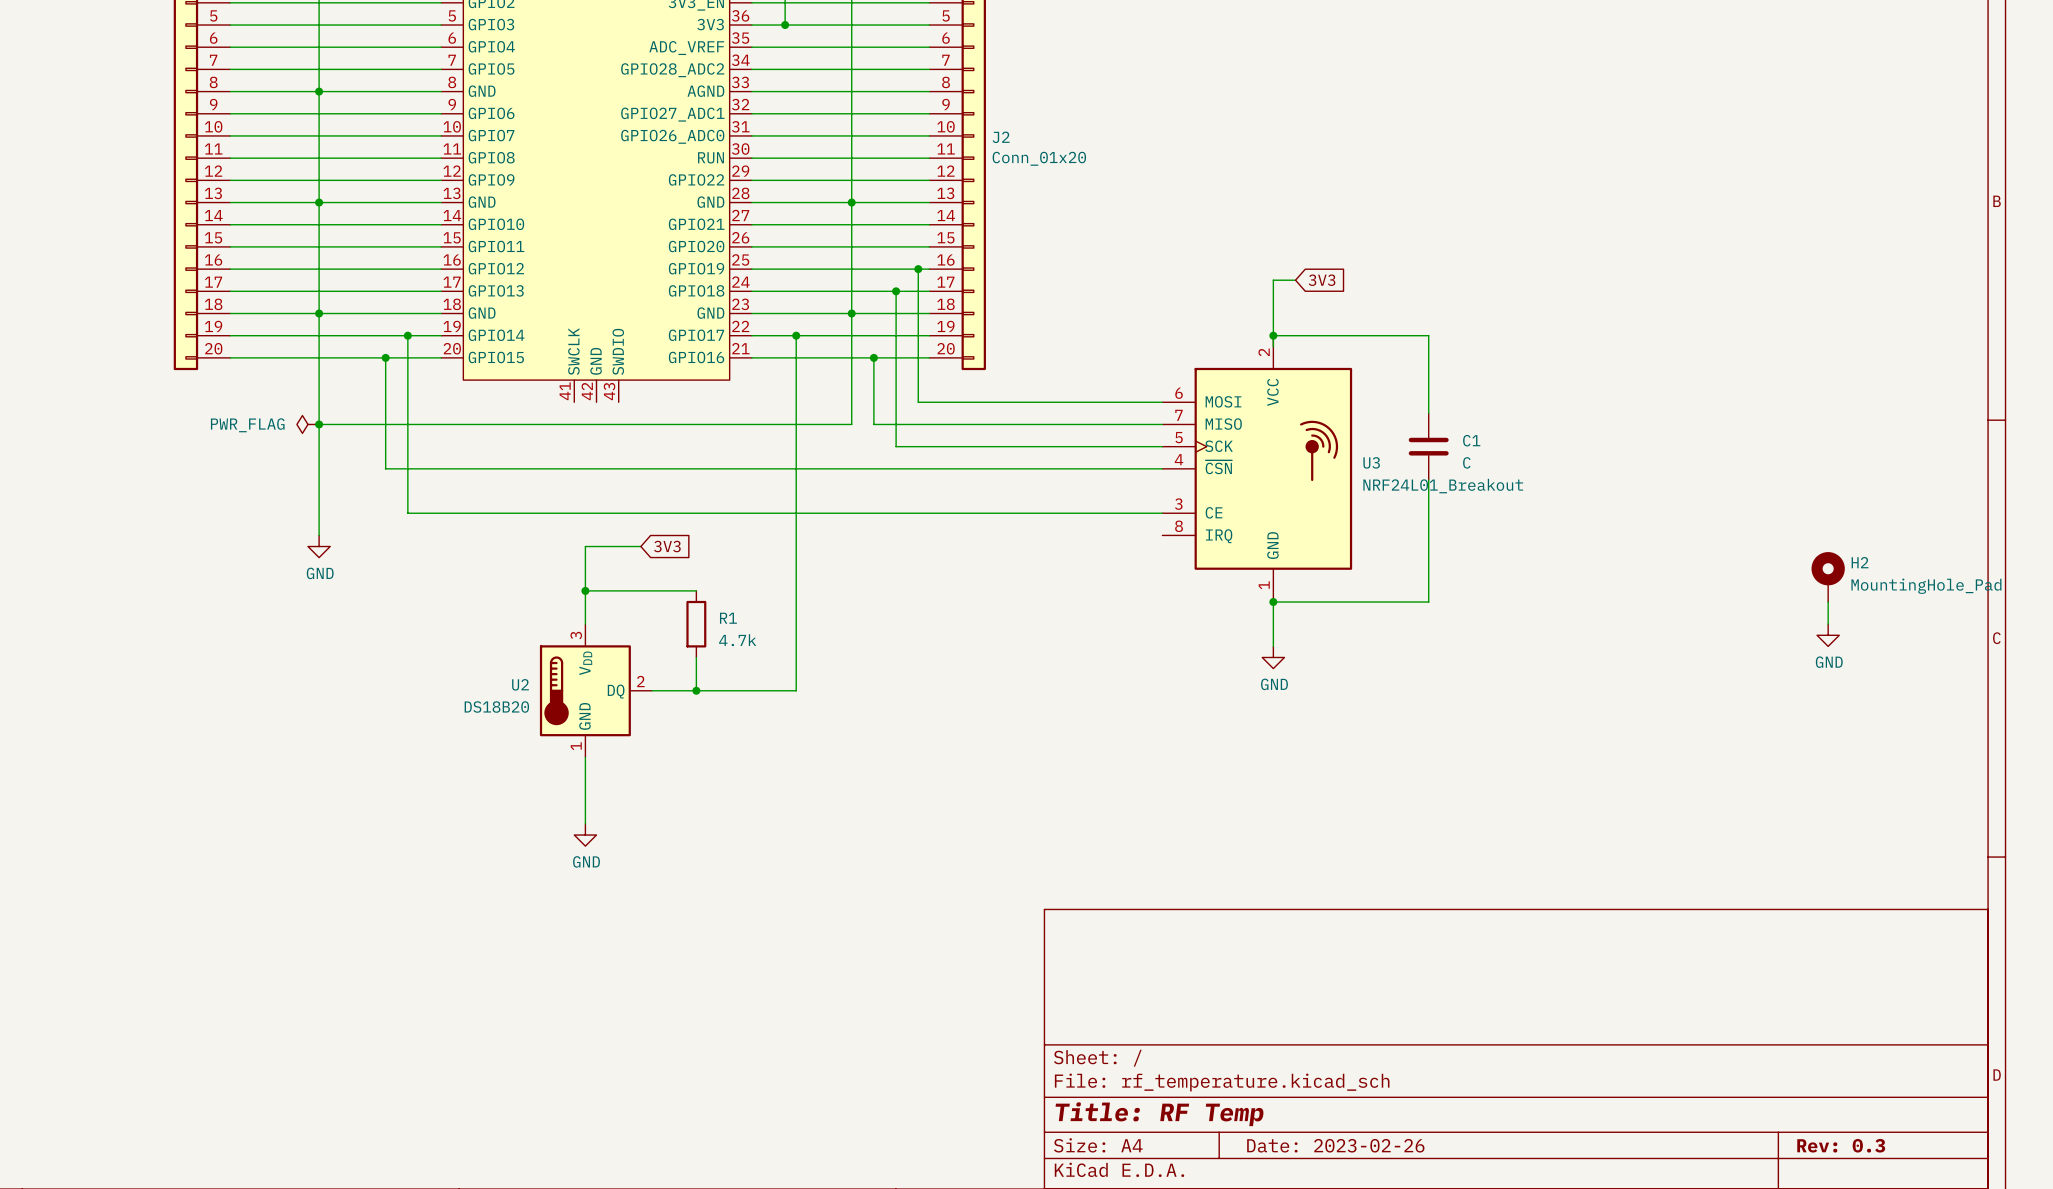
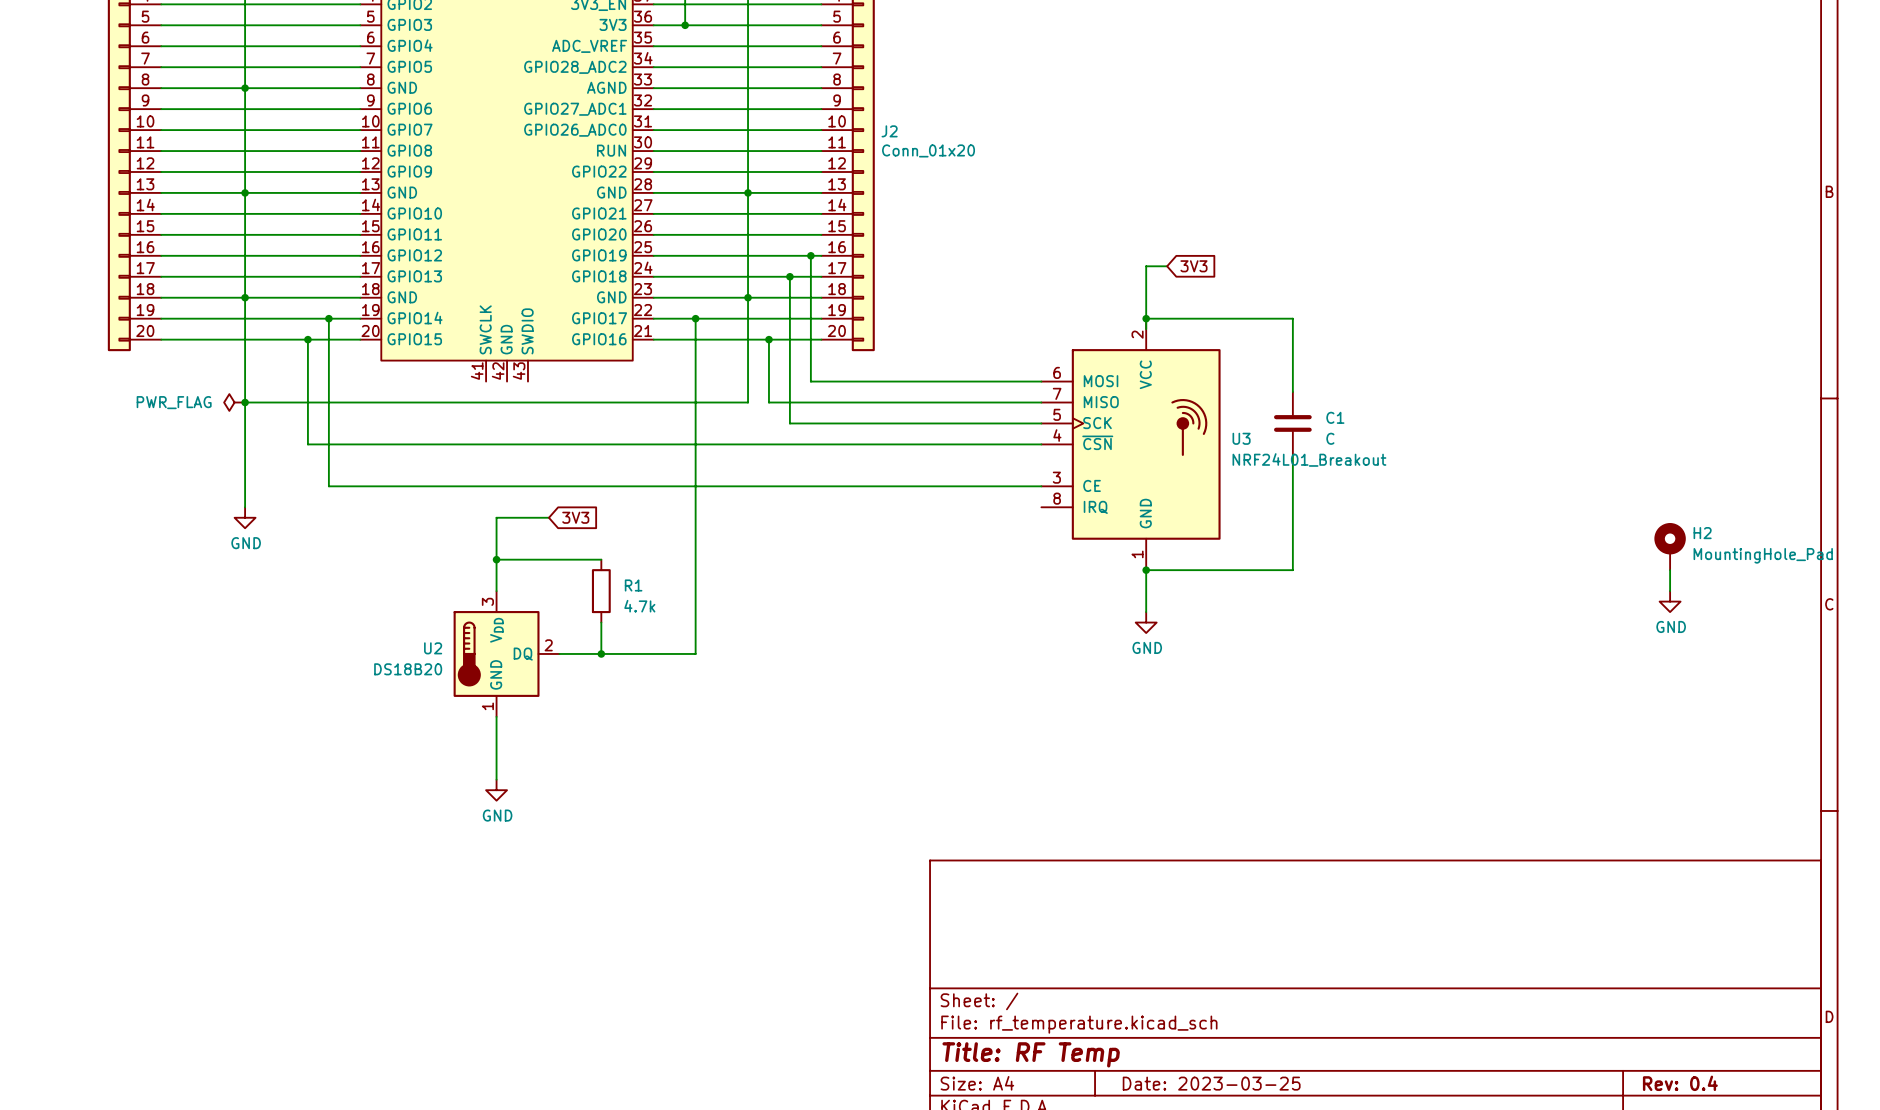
title block: Date: 2023-02-26 (1335, 1145) -> Date: 2023-03-25 (1211, 1083)
title block: Rev: 0.3 (1841, 1145) -> Rev: 0.4 (1680, 1083)

